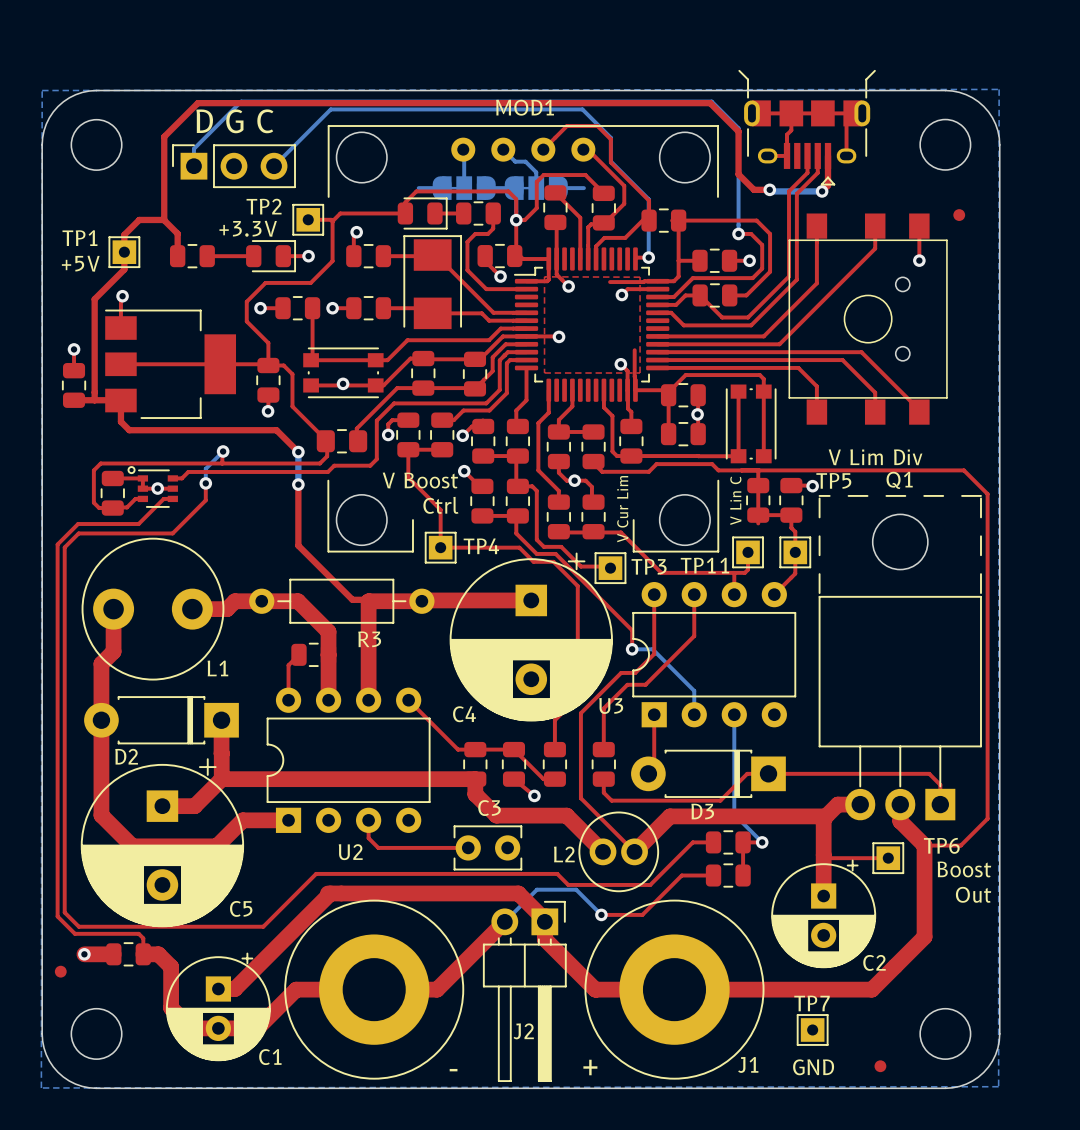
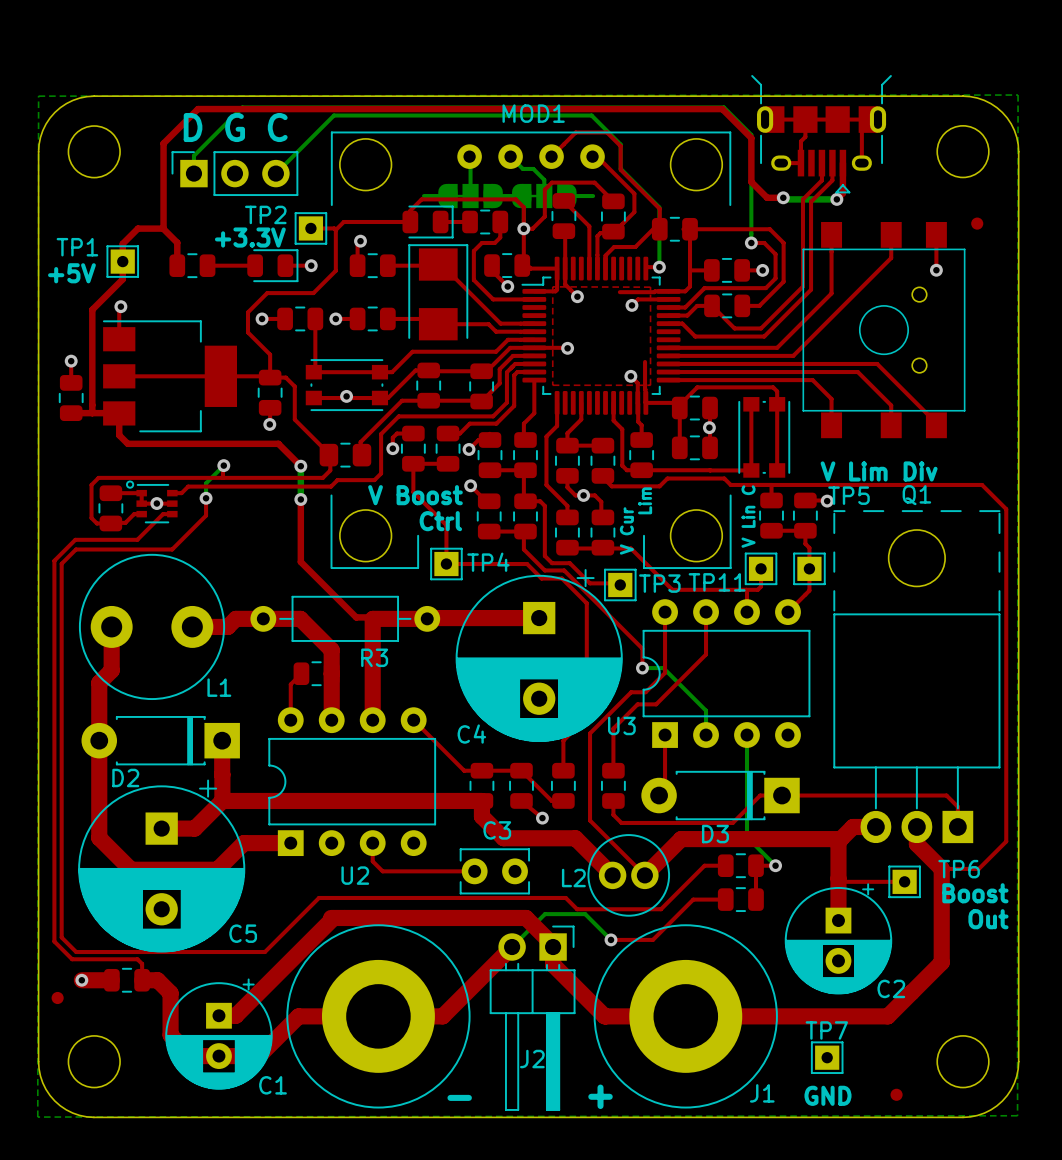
top track: (758, 485) (758, 523) -> none
text: none -> Lim (645, 500)
text: V Cur Lim (622, 509) -> V Cur (626, 530)

